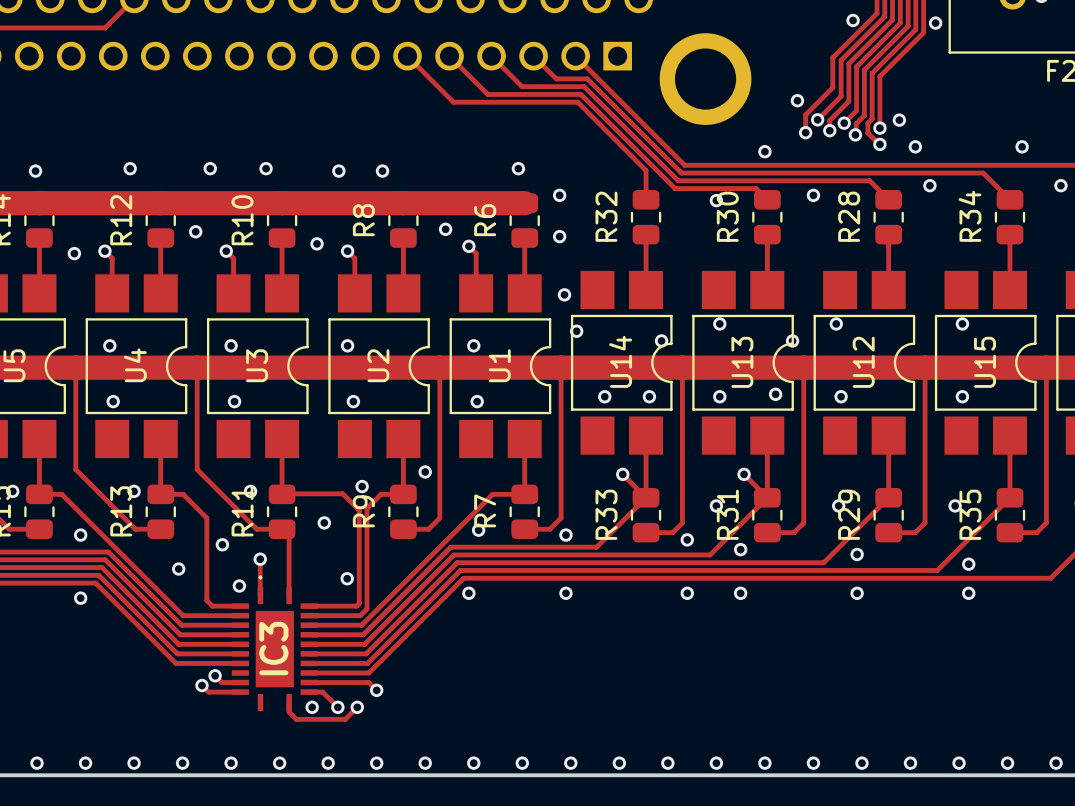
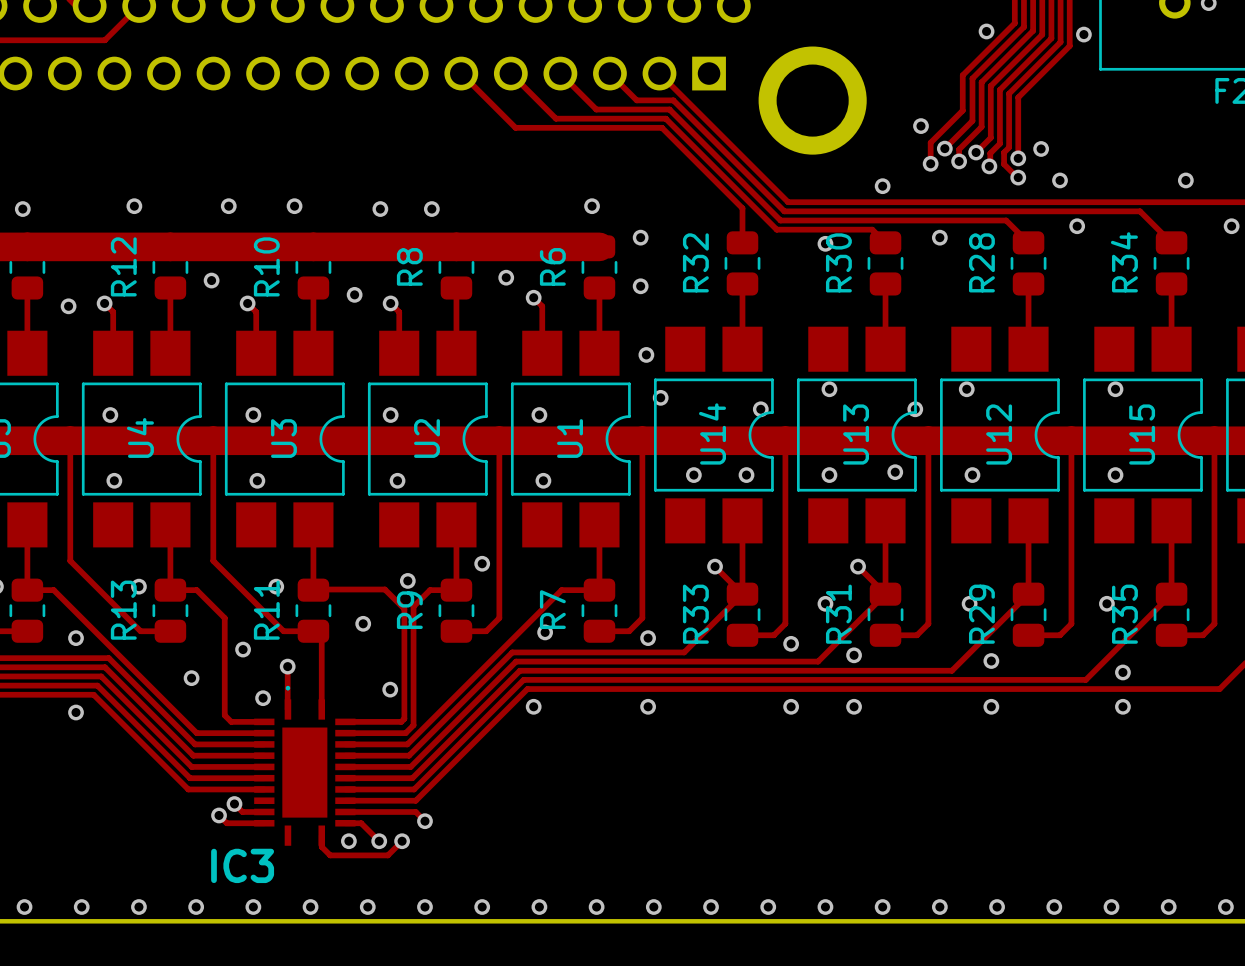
IC3 name rotation: 0° (273, 648) -> 90° clockwise (242, 865)
IC3 name position: IC3 (273, 648) -> IC3 (242, 865)

